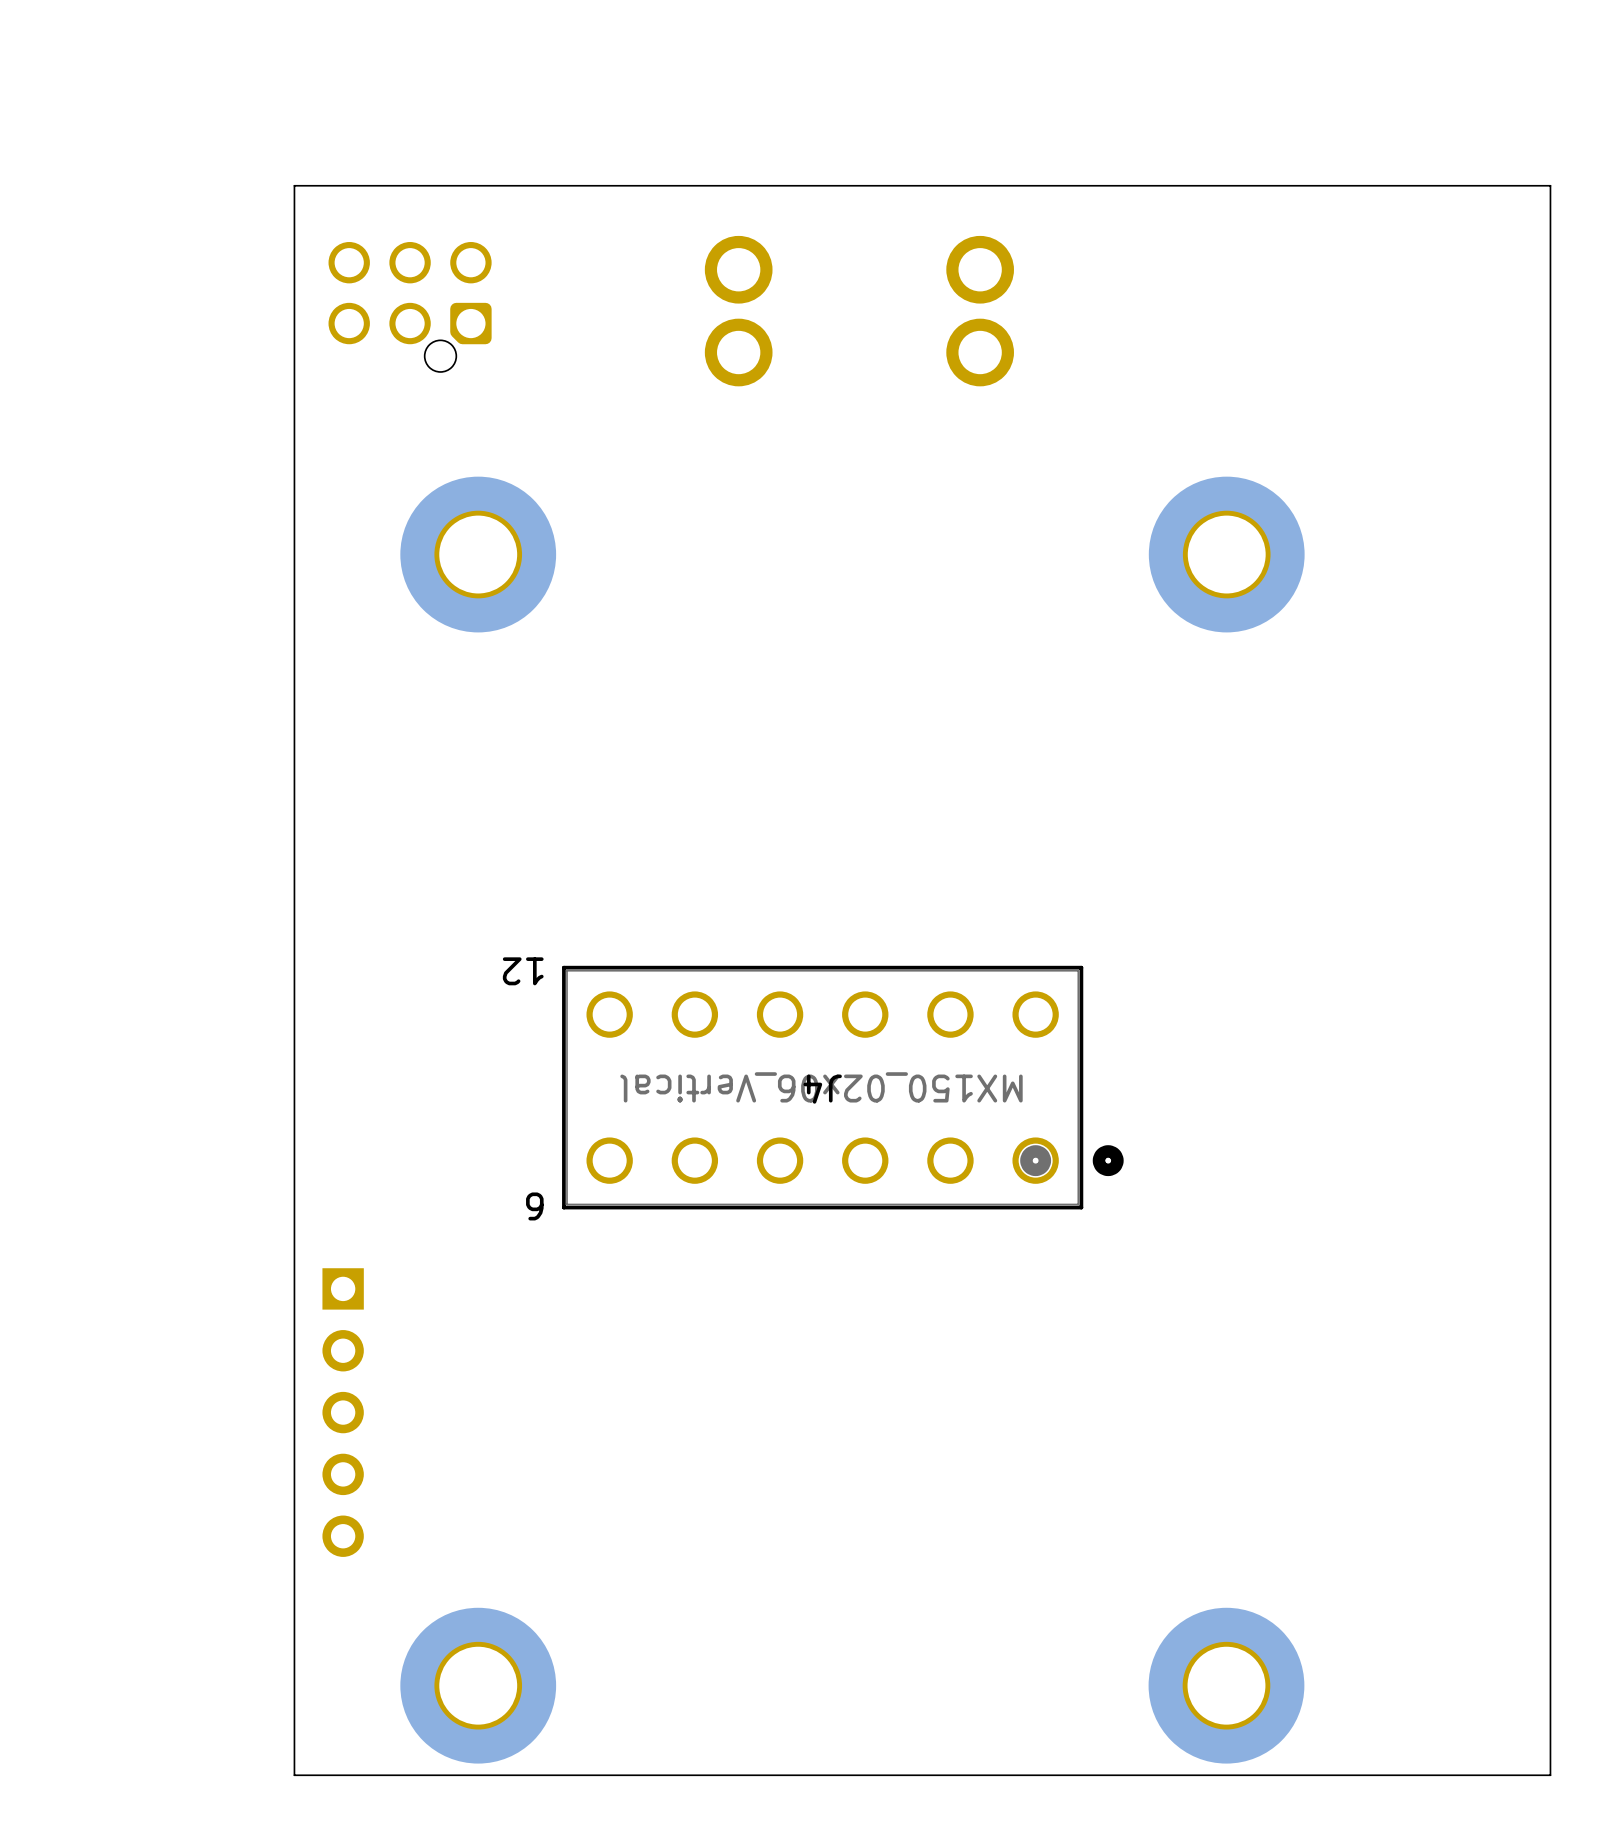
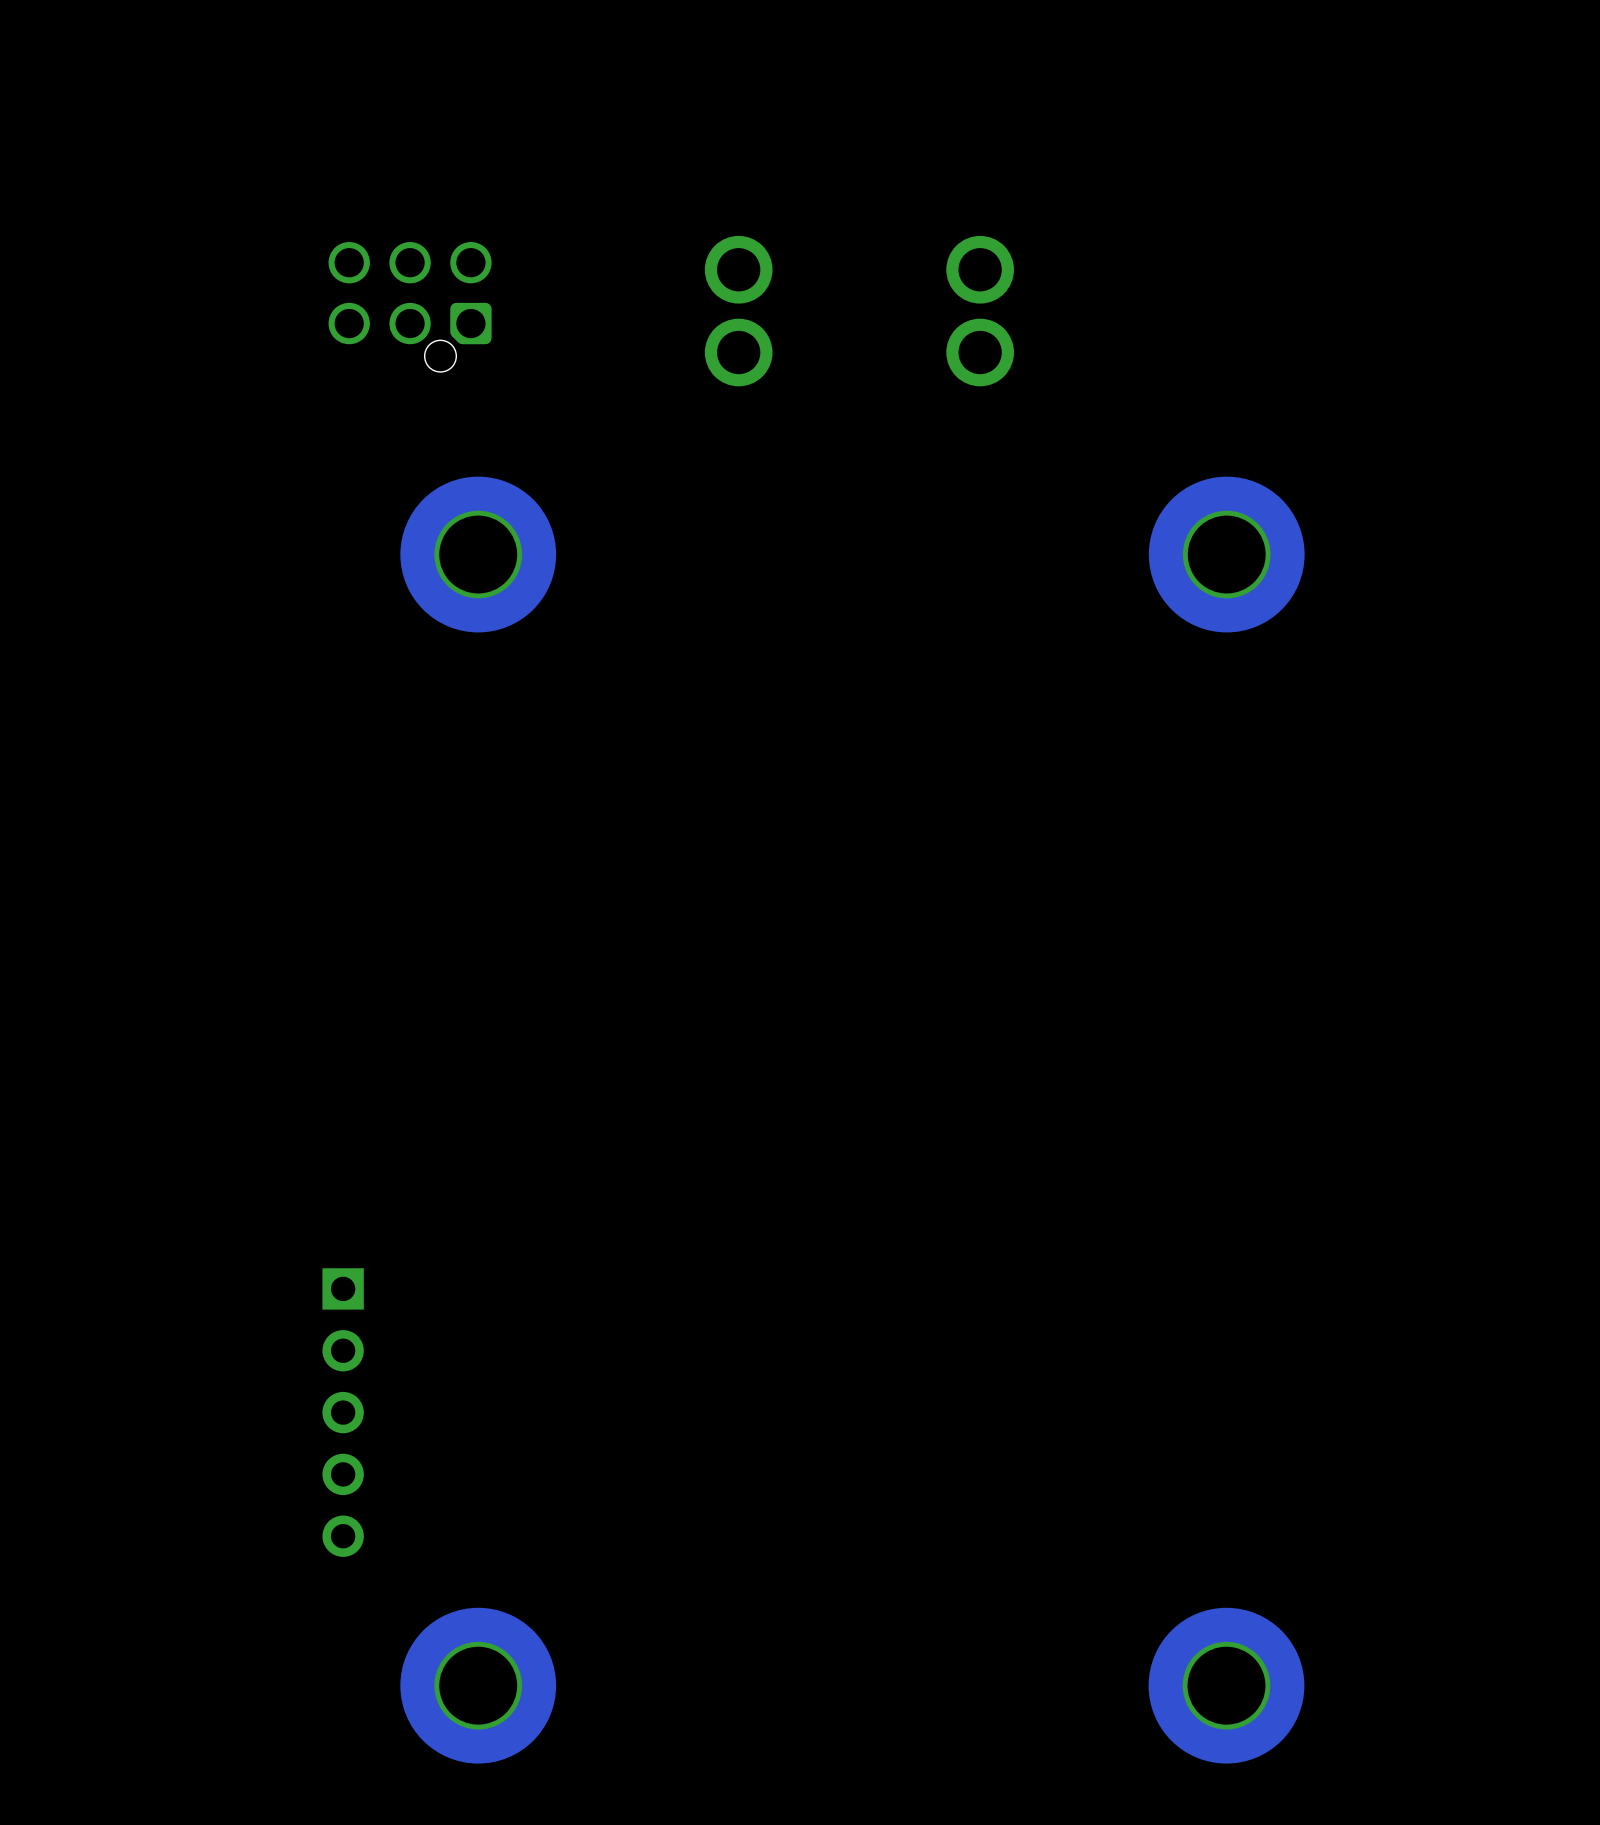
board edge: (1550, 185) (294, 185) (294, 1775) (1550, 1775) (1550, 185) -> none
J4: MX150_02x06_Vertical (842, 1087) -> none

